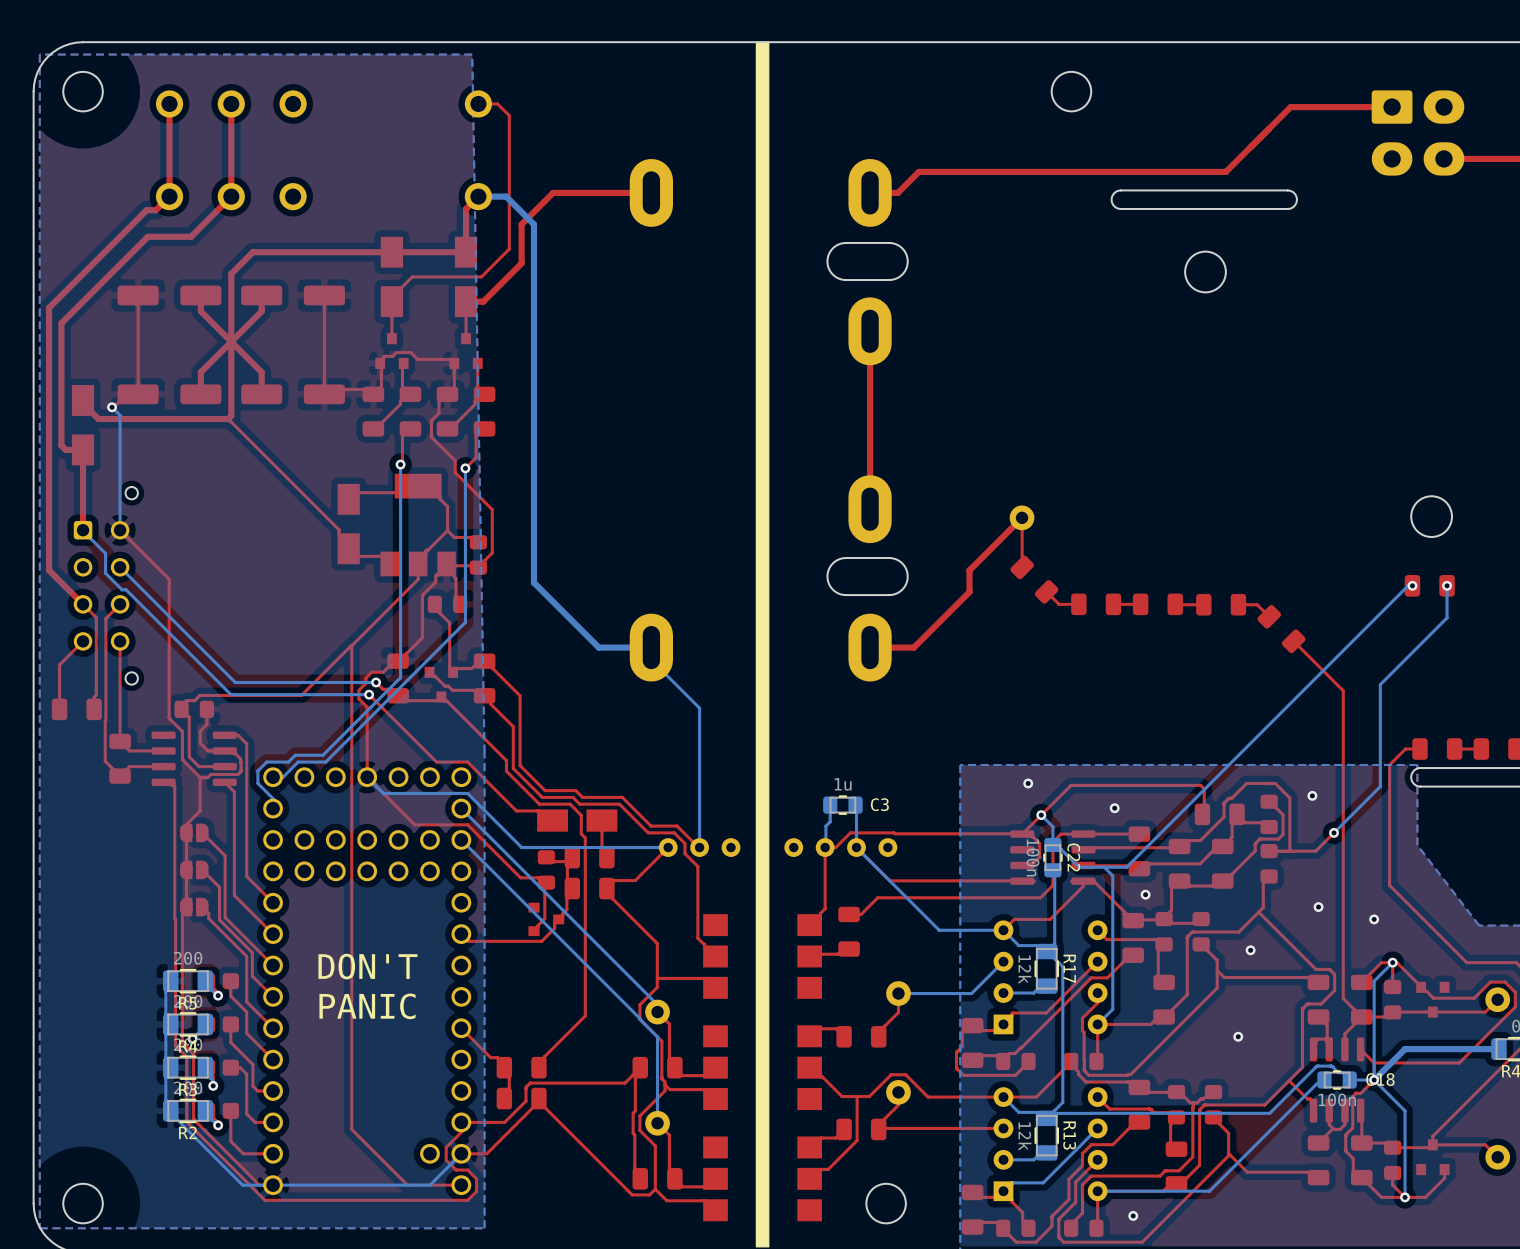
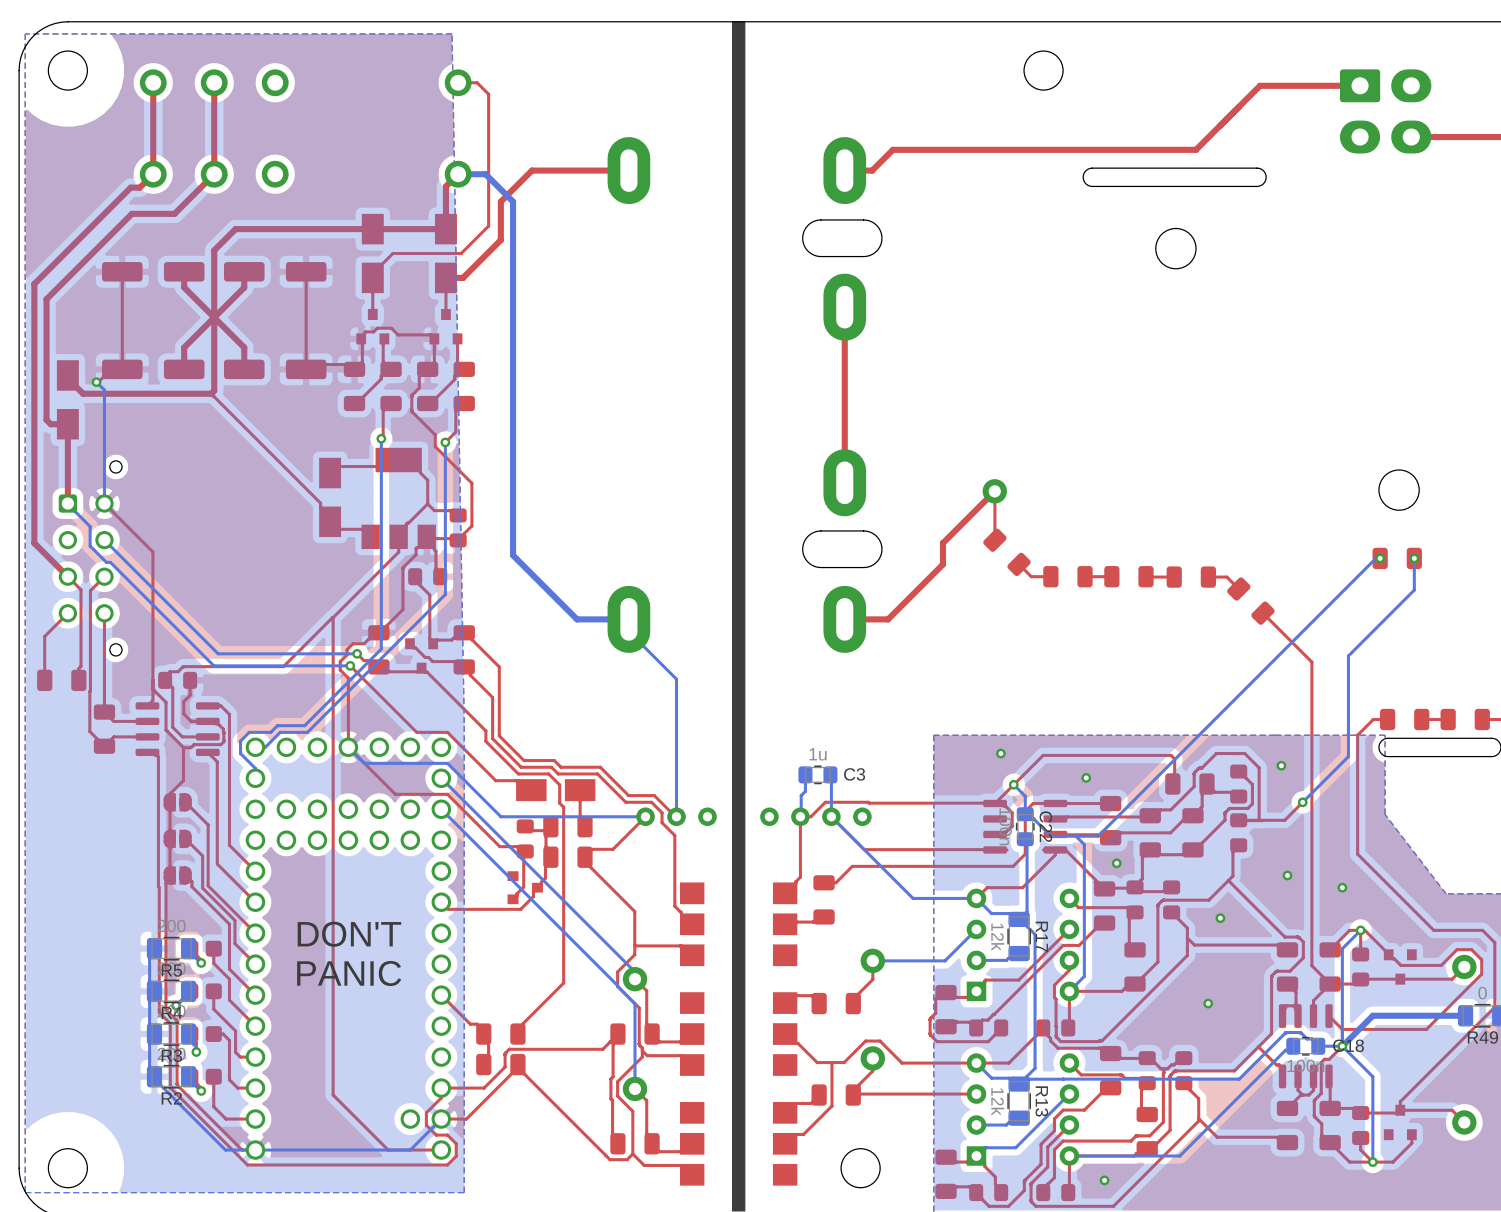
top track: none -> (152, 688) (152, 700) (147, 705)

